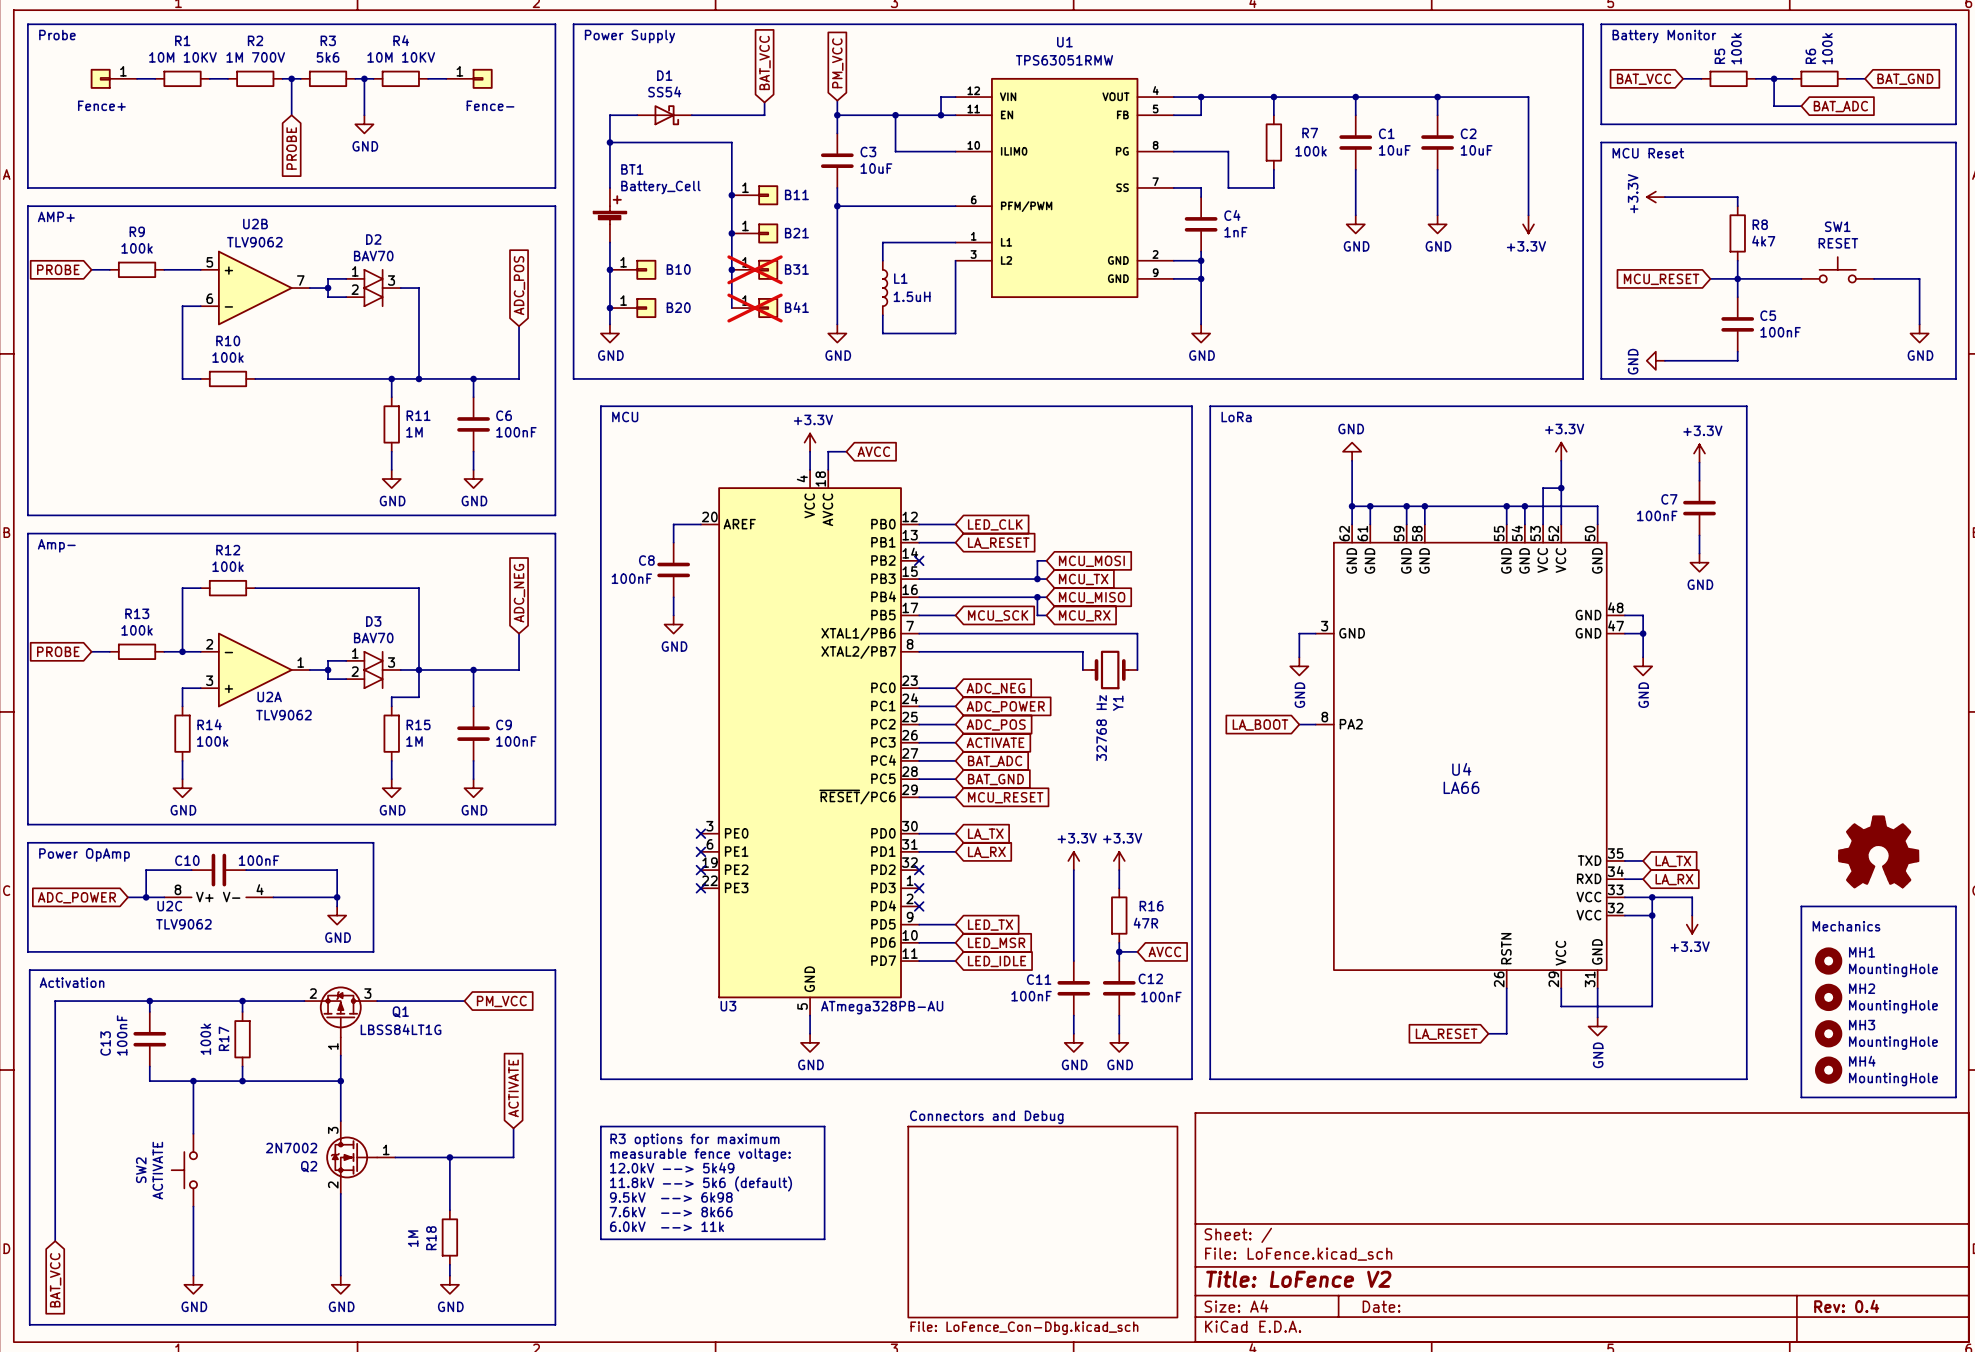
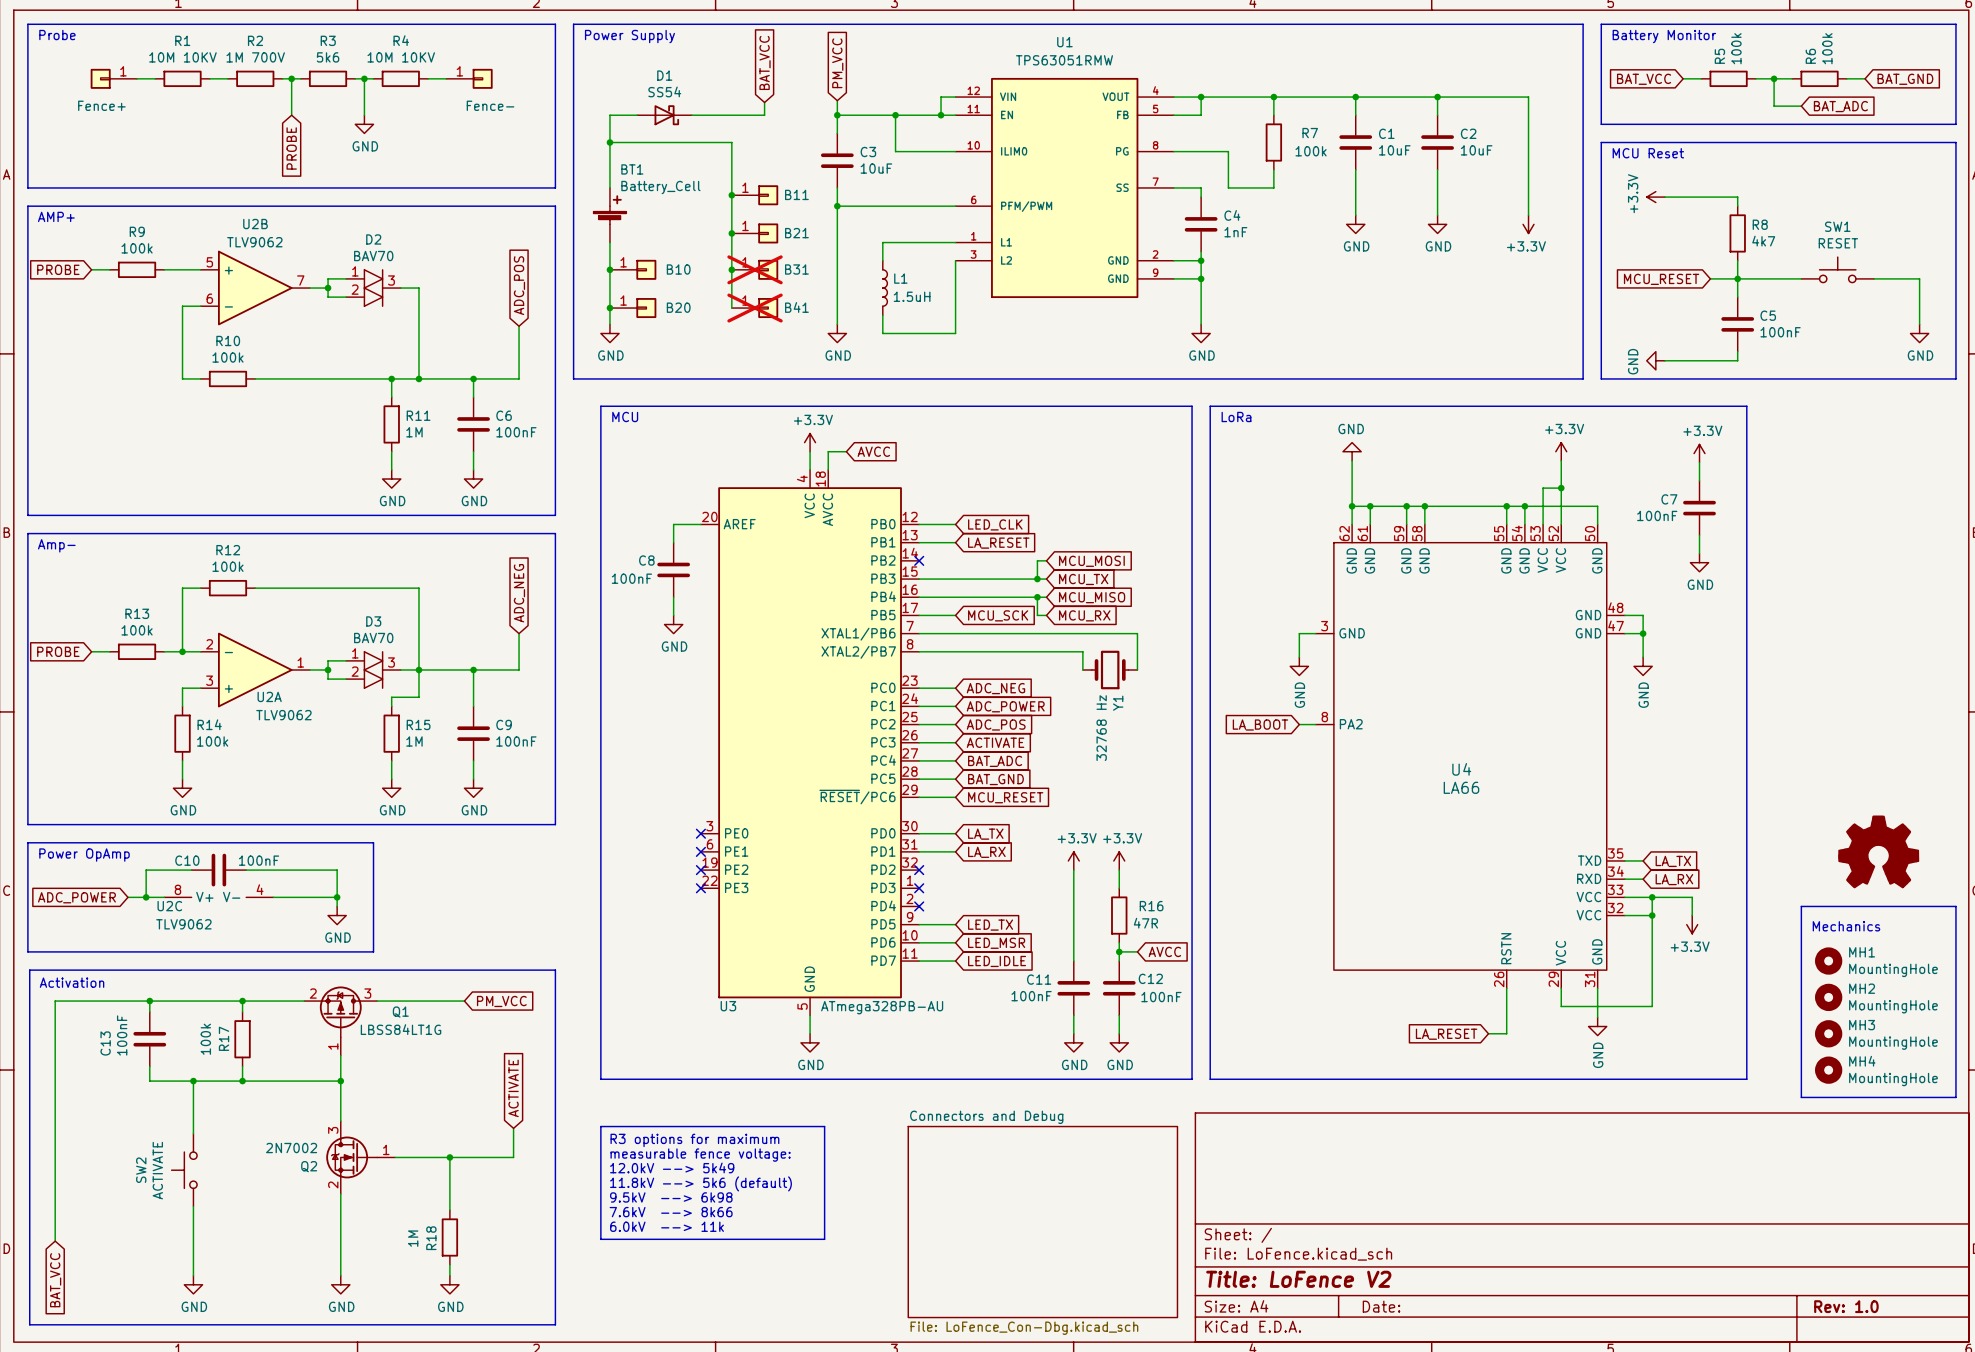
title block: Rev: 0.4 (1846, 1306) -> Rev: 1.0 (1846, 1306)

